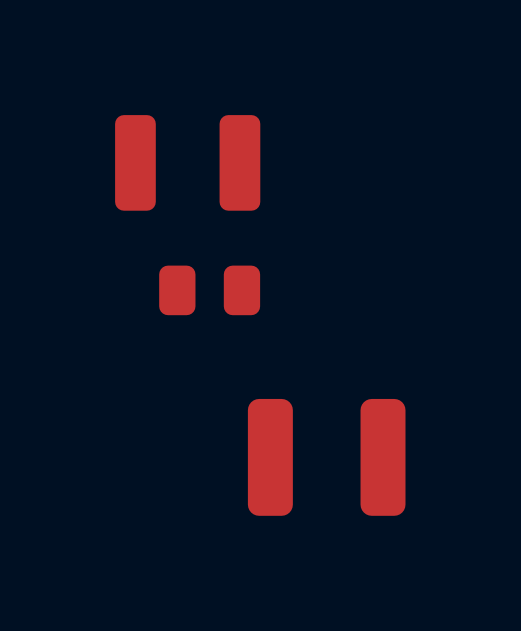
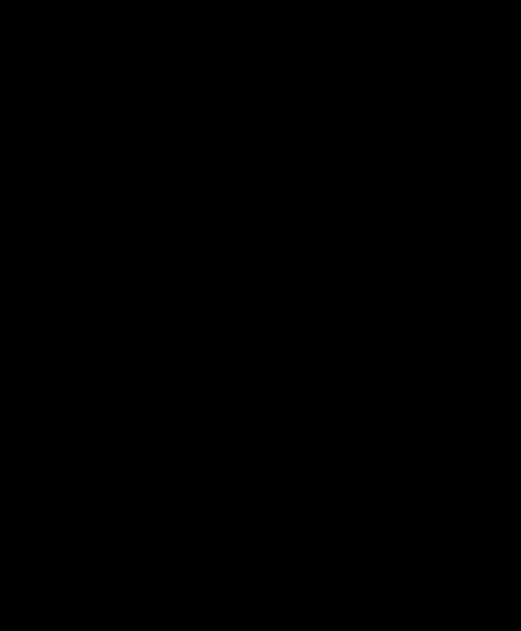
part: (187, 162) -> none
part: (209, 290) -> none
part: (326, 457) -> none

